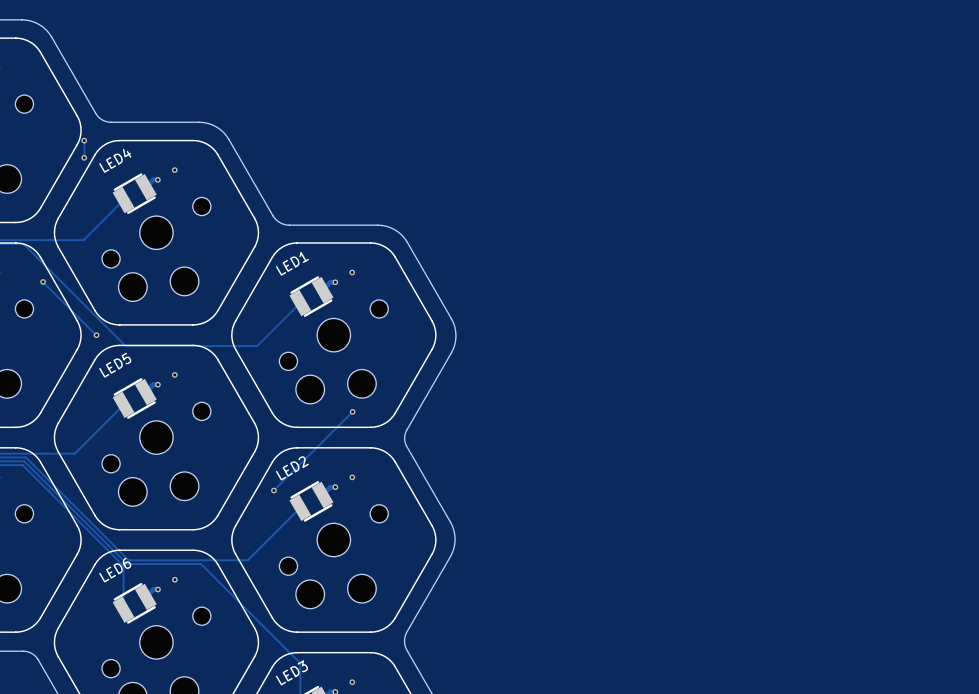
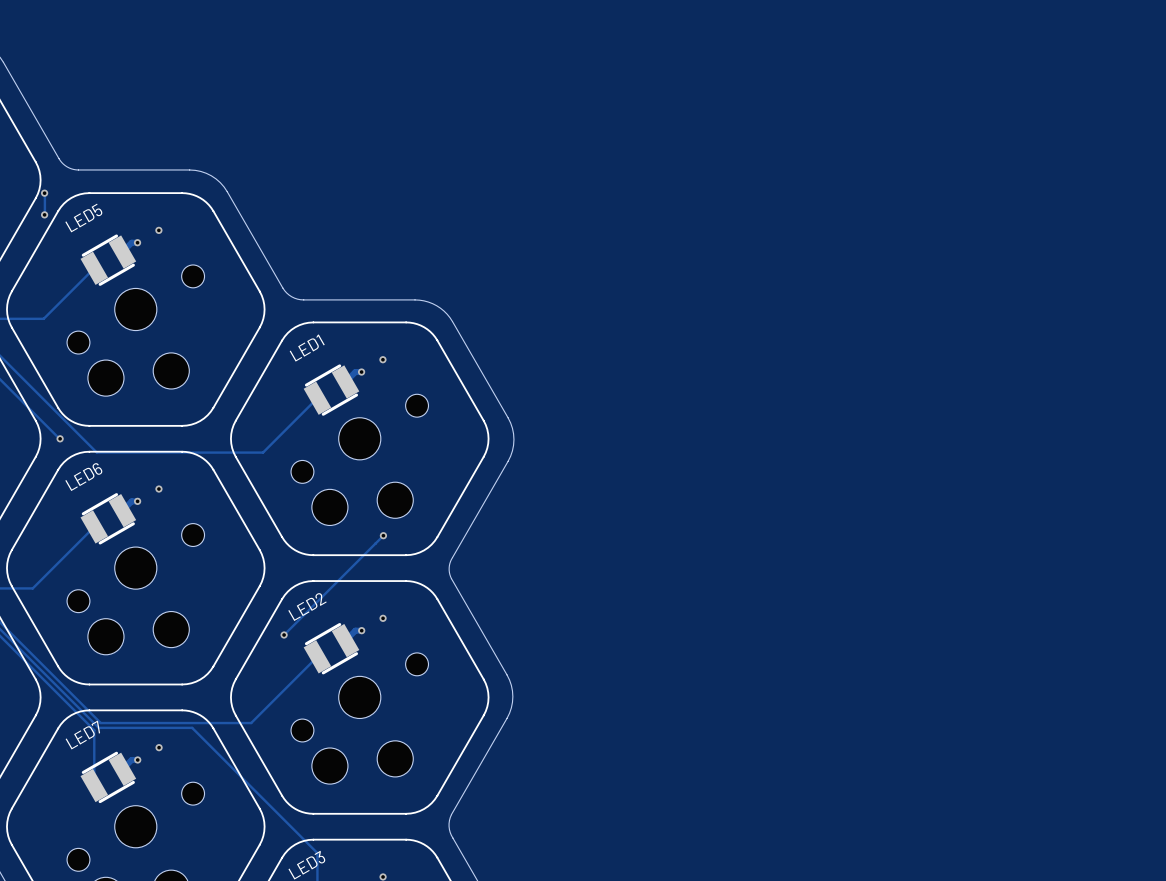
LED4 name: LED4 (115, 160) -> LED5 (83, 218)
LED5 name: LED5 (115, 365) -> LED6 (83, 477)
LED6 name: LED6 (115, 570) -> LED7 (82, 735)

